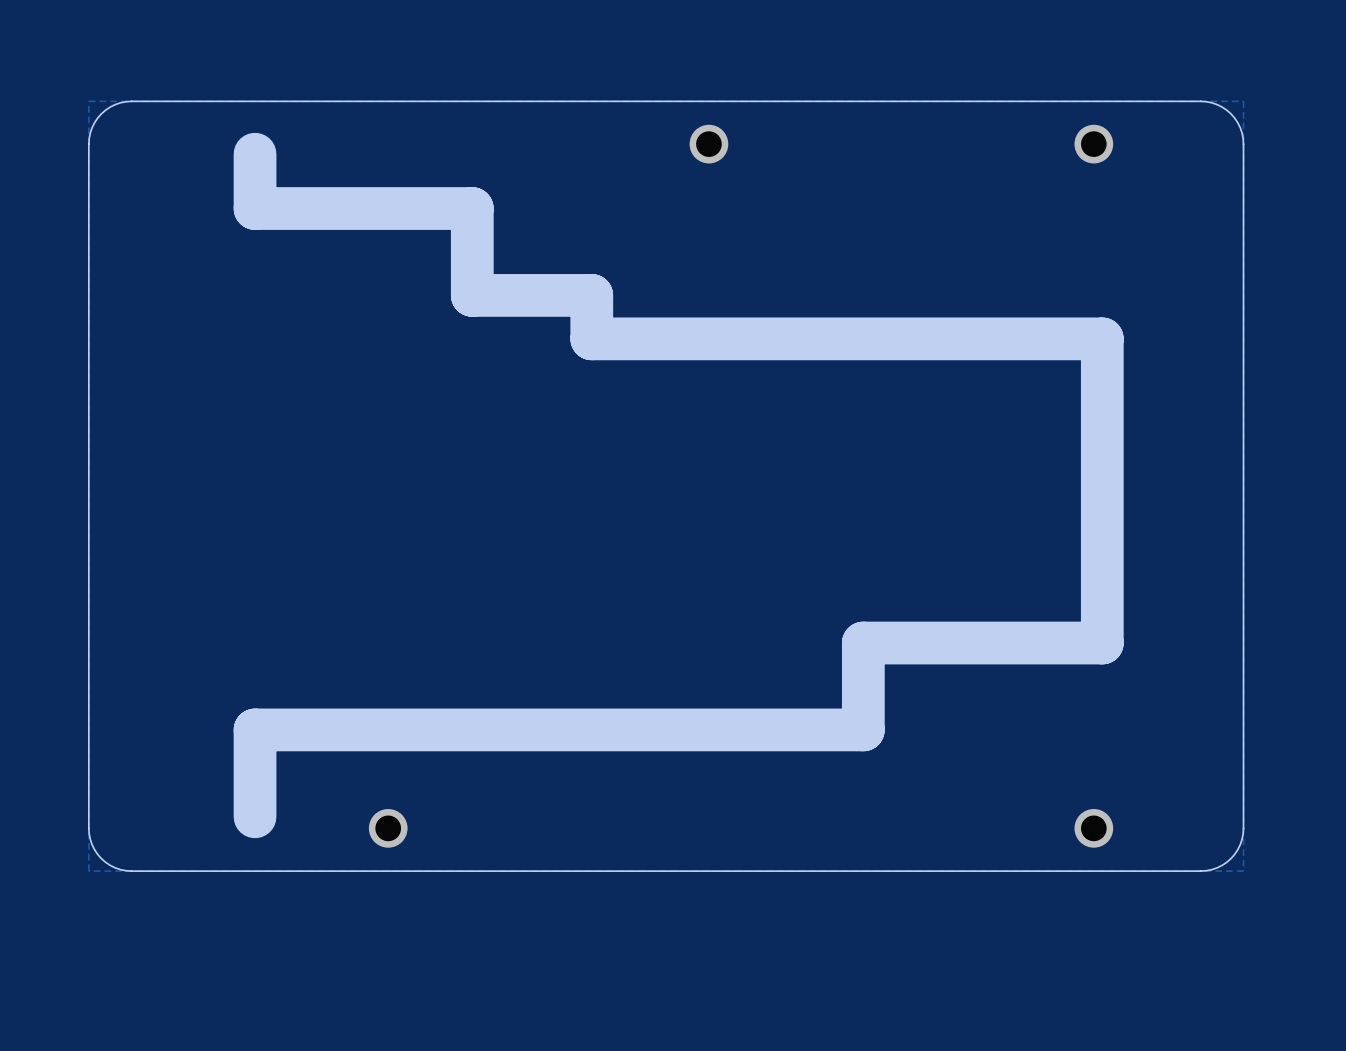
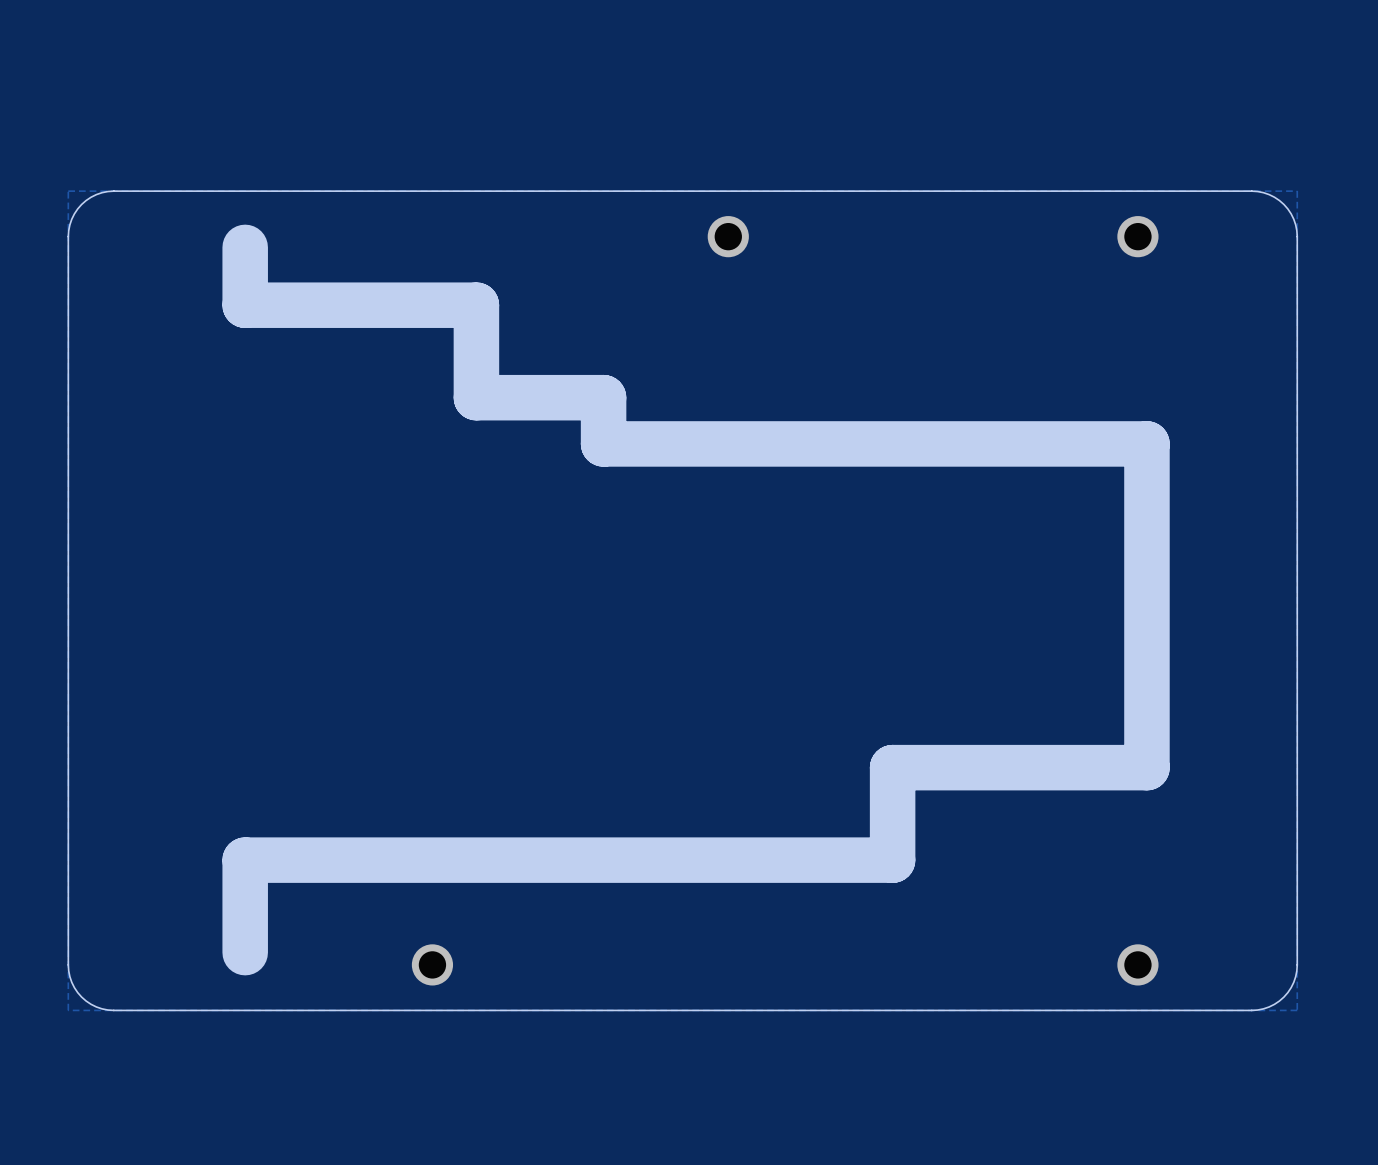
via position: (388, 828) -> (432, 964)

